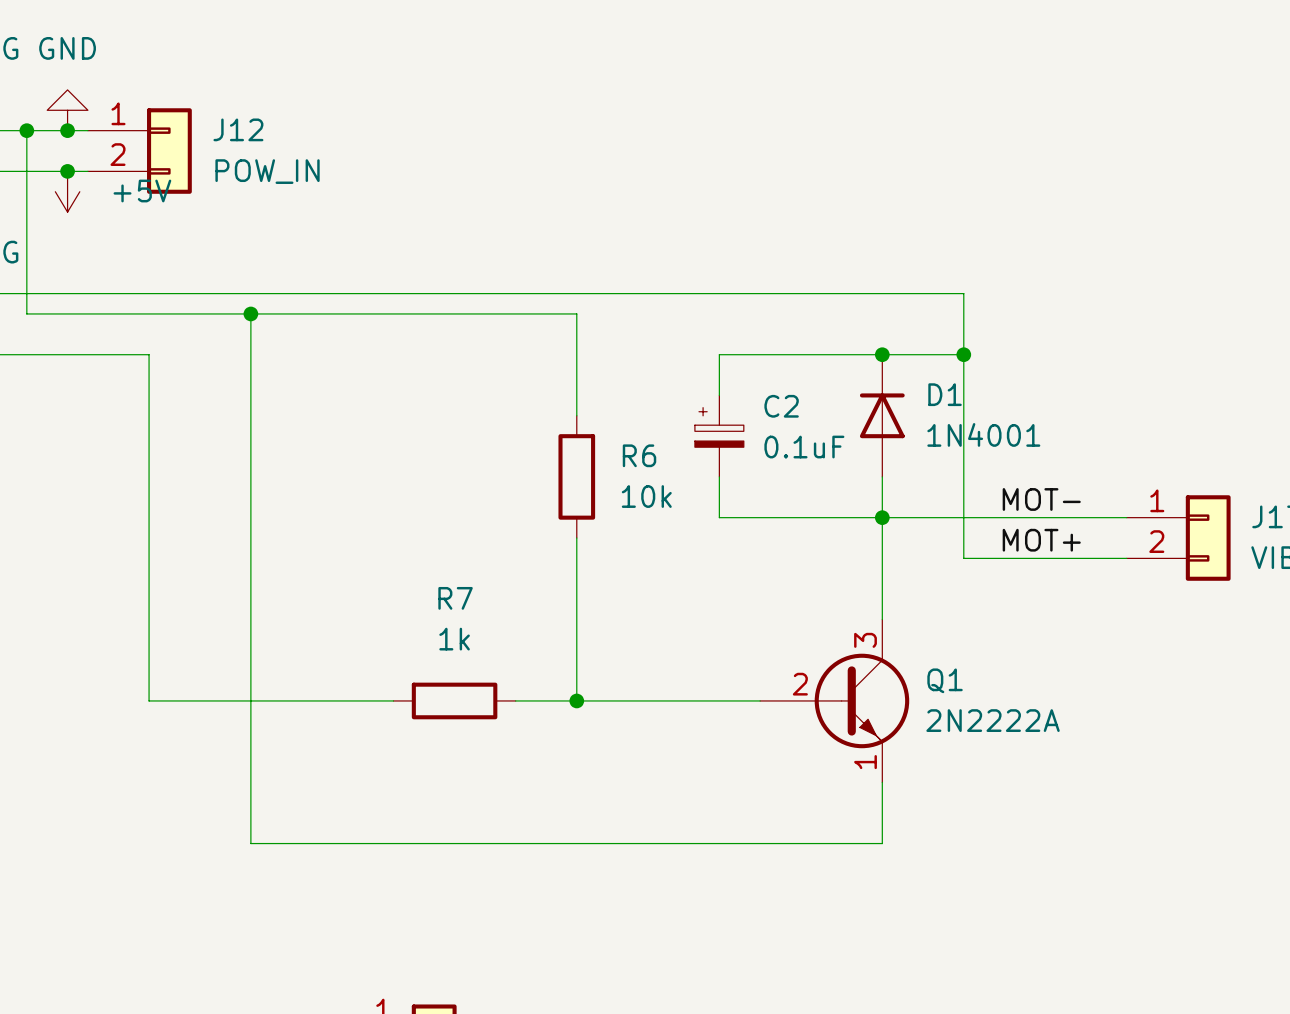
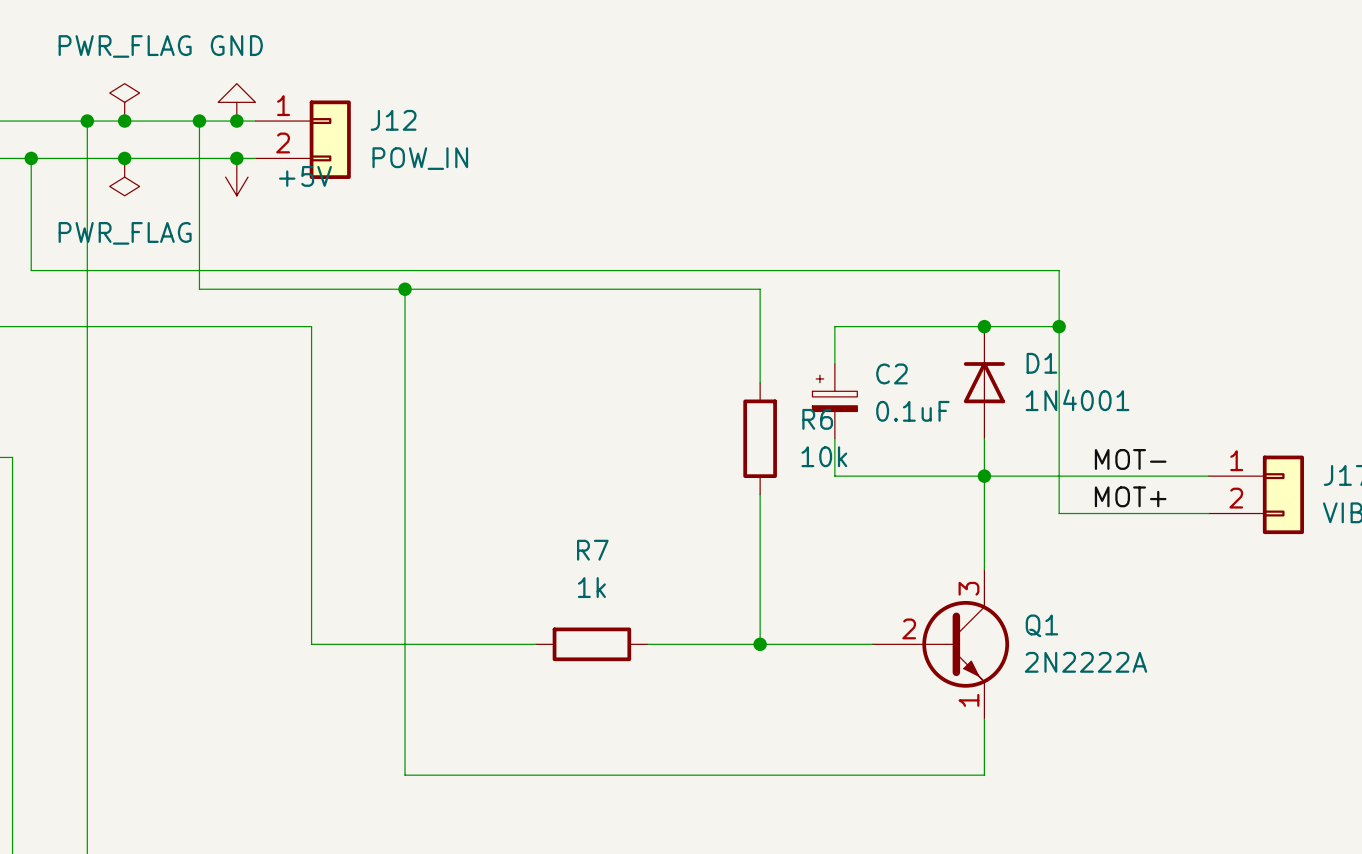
wire: (576, 313) (576, 415) -> (704, 289) (760, 289) (760, 382)
R6 position: (576, 476) -> (760, 438)
wire: (576, 538) (576, 700) -> (760, 494) (760, 644)
junction position: (576, 700) -> (760, 644)

